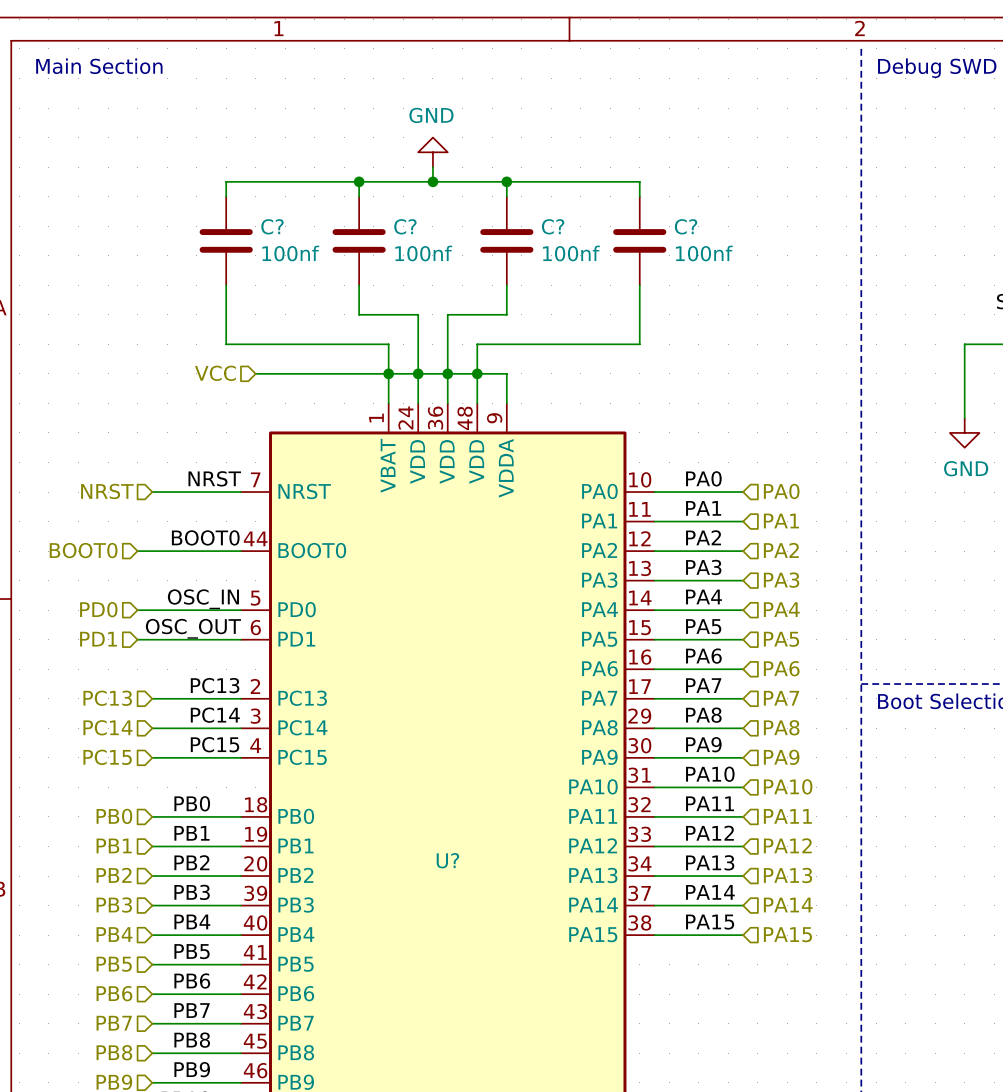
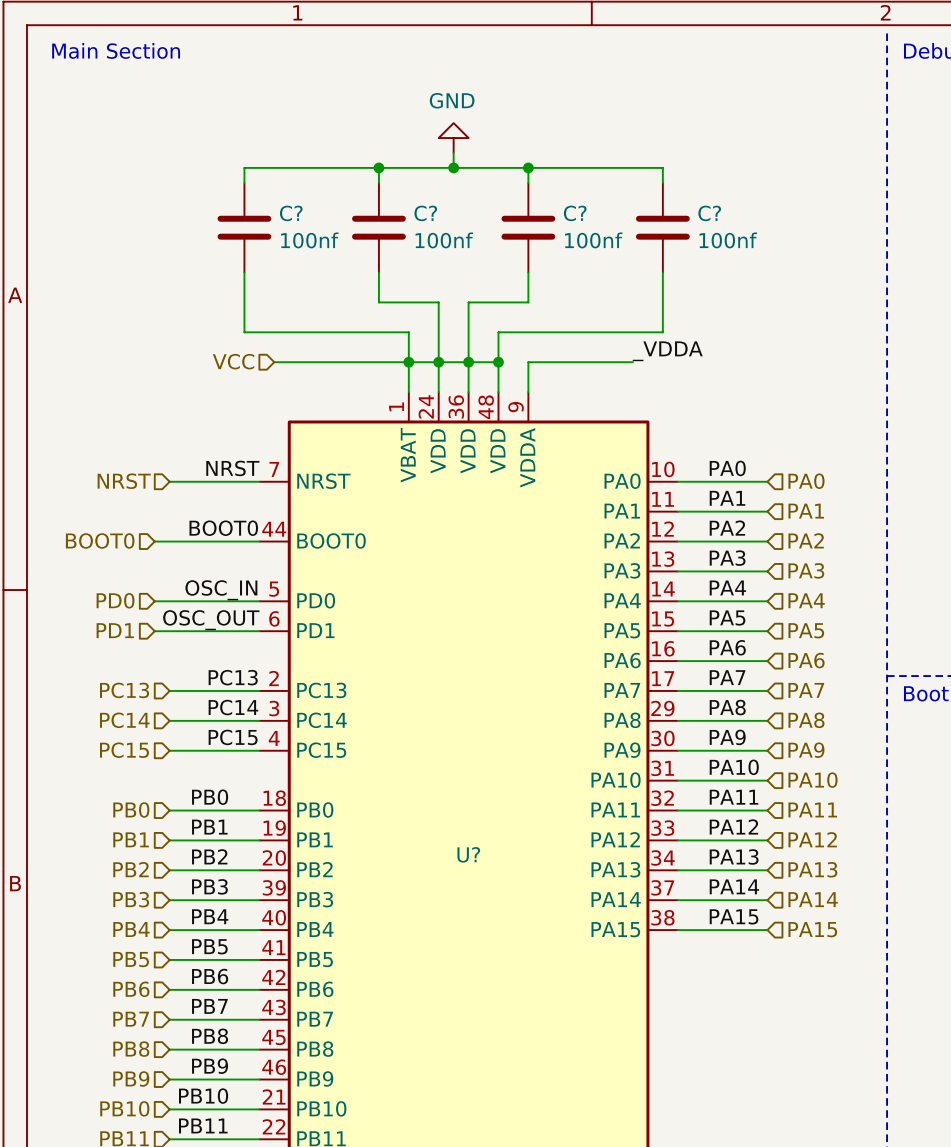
label: none -> _VDDA (667, 351)
wire: (477, 373) (506, 373) -> (632, 362) (528, 362)

